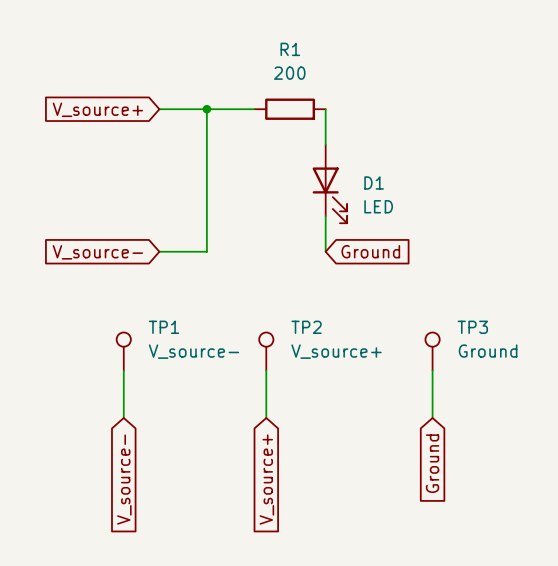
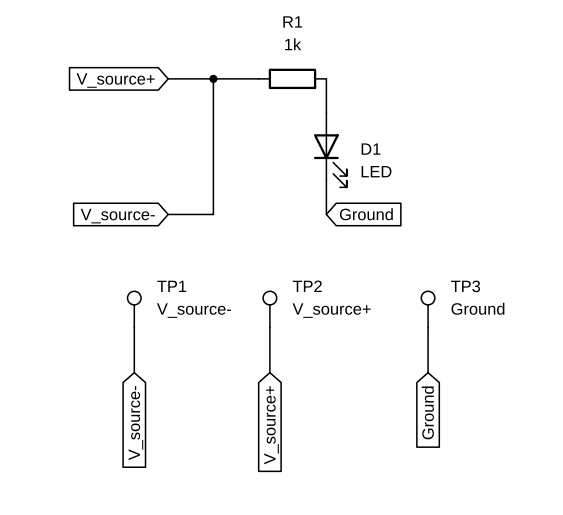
R1 value: 200 (289, 73) -> 1k (293, 44)

